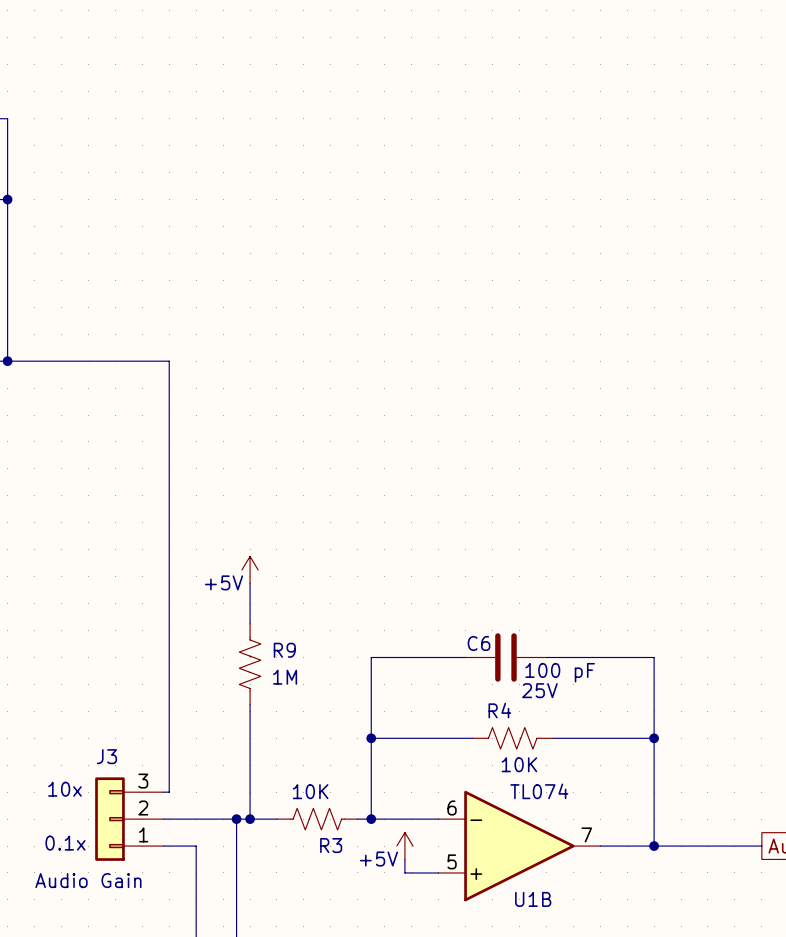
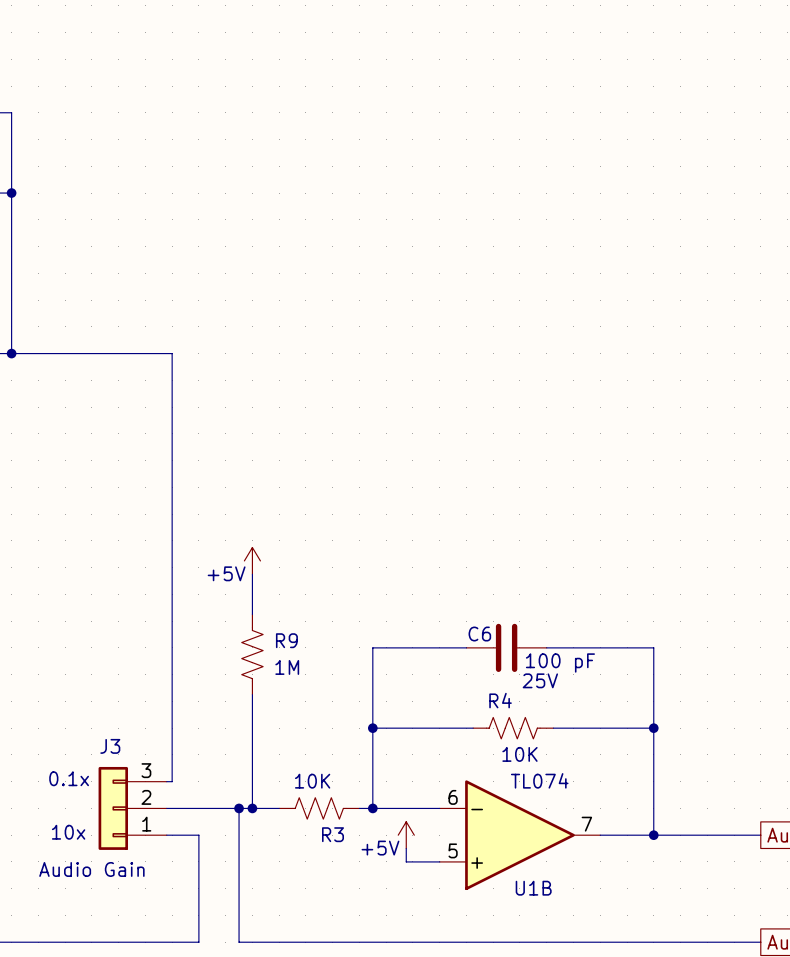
text: 10x (64, 789) -> 0.1x (69, 778)
text: 0.1x (65, 843) -> 10x (68, 832)

